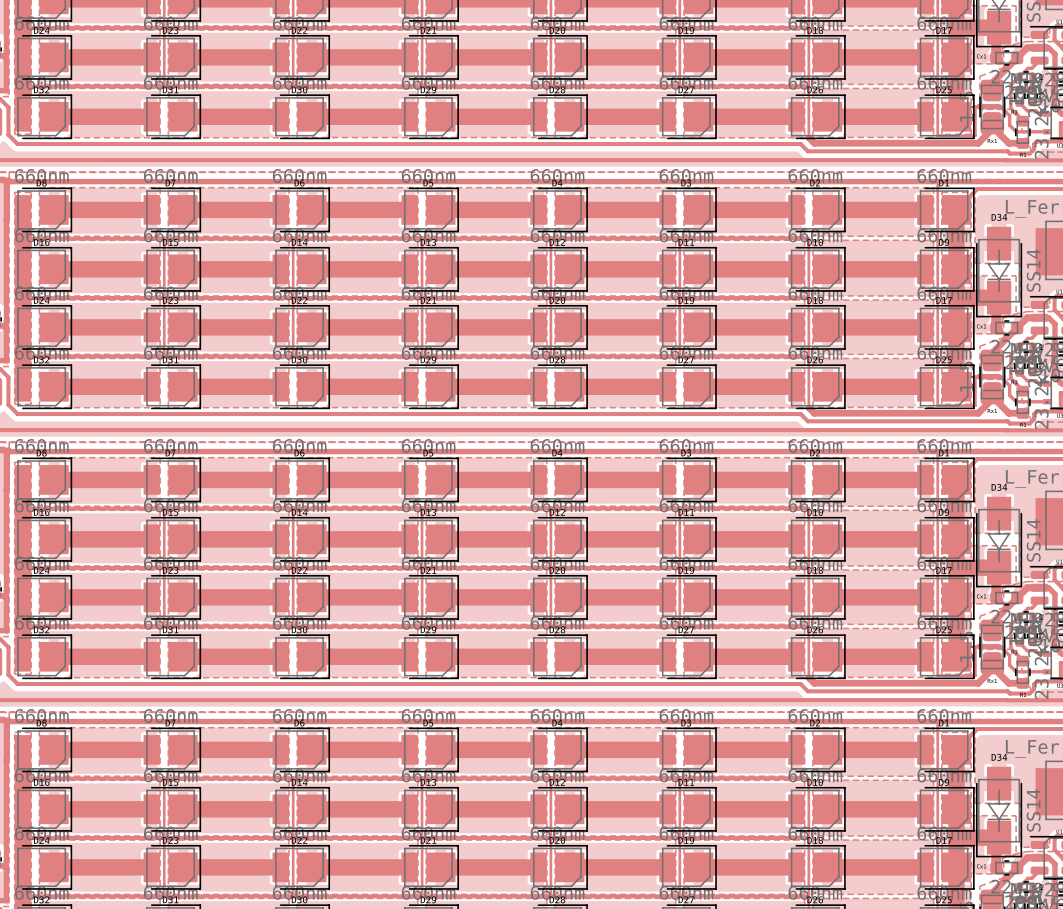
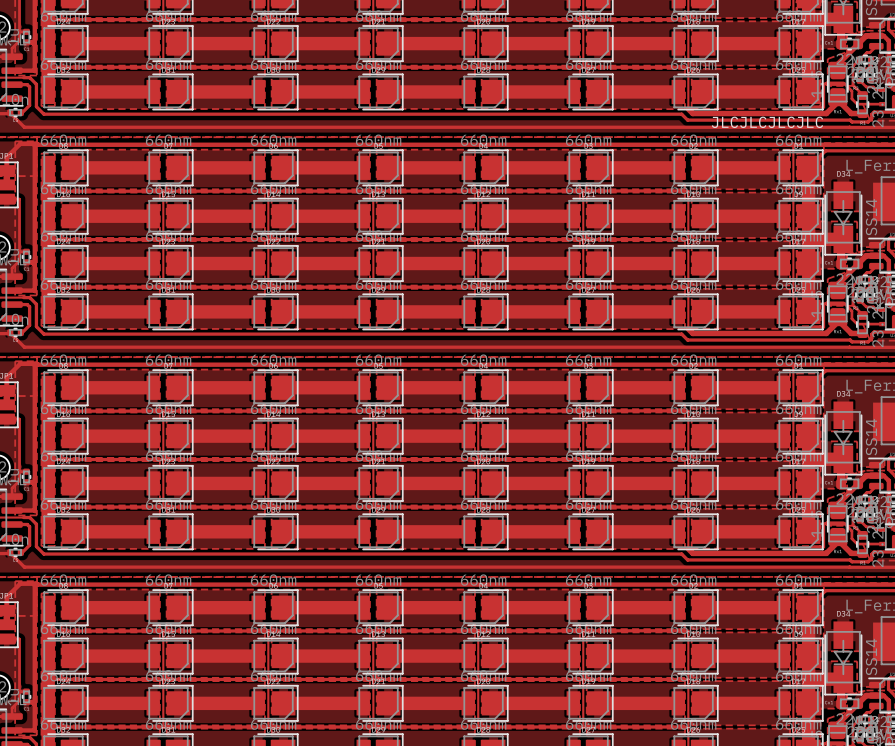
text: none -> JLCJLCJLCJLC (767, 122)

